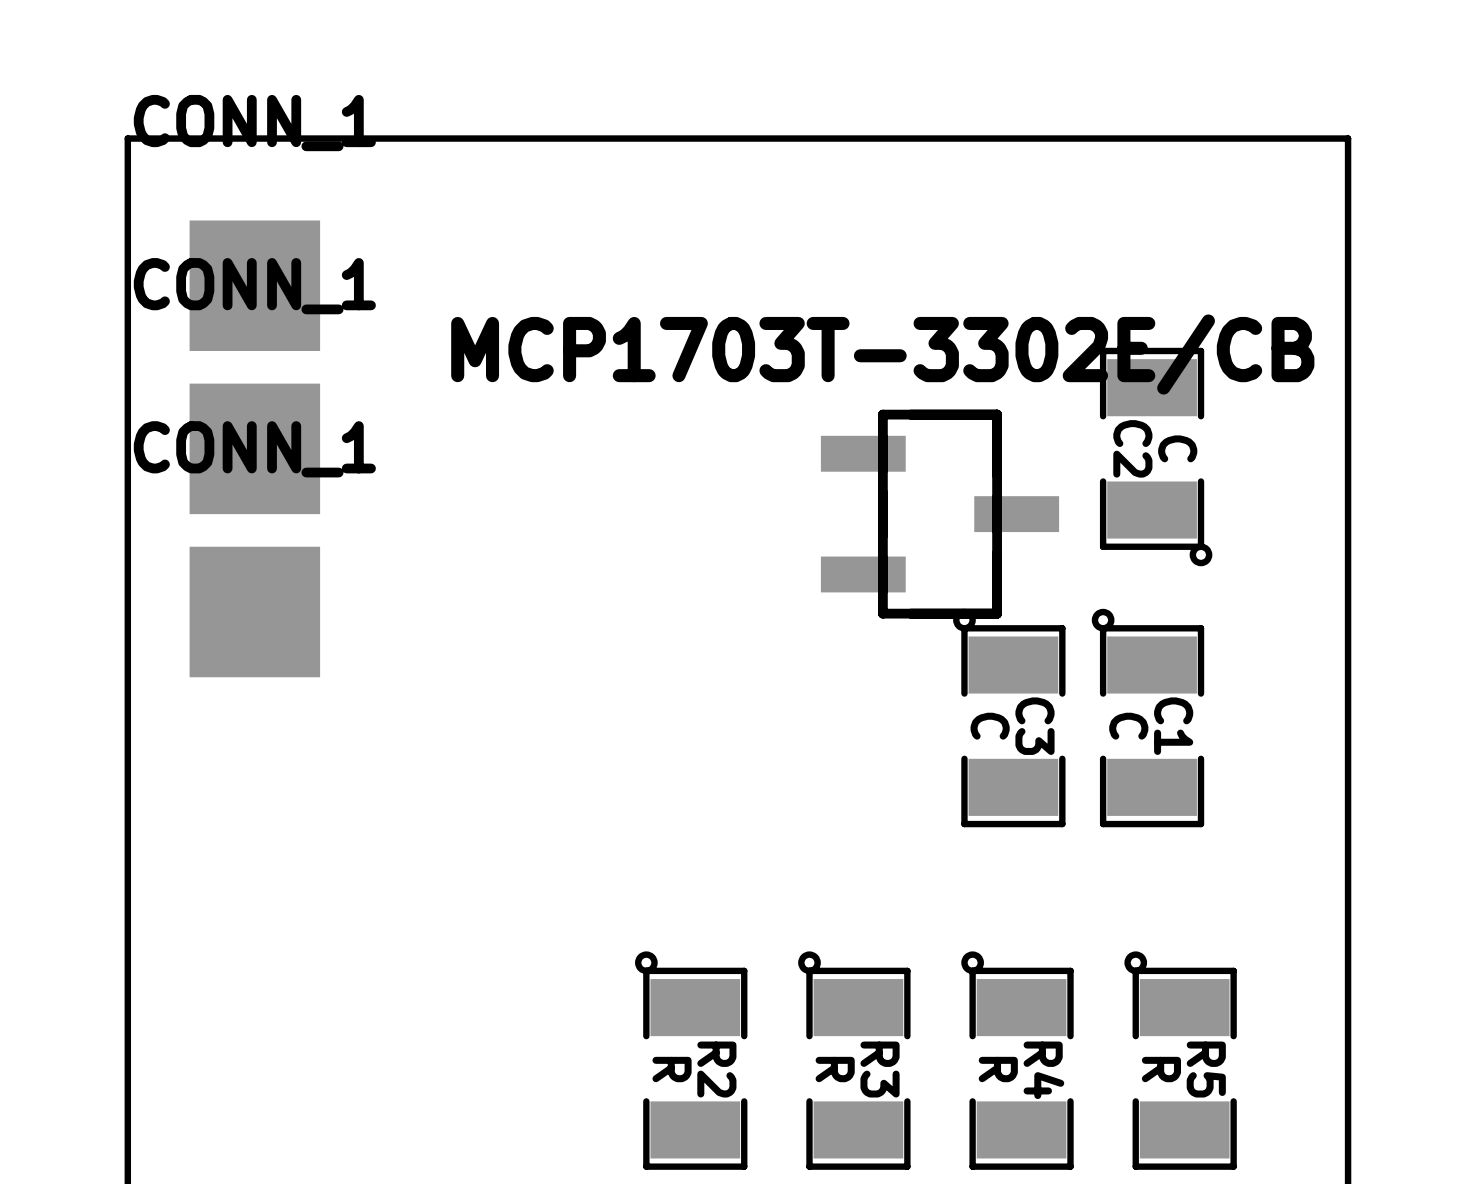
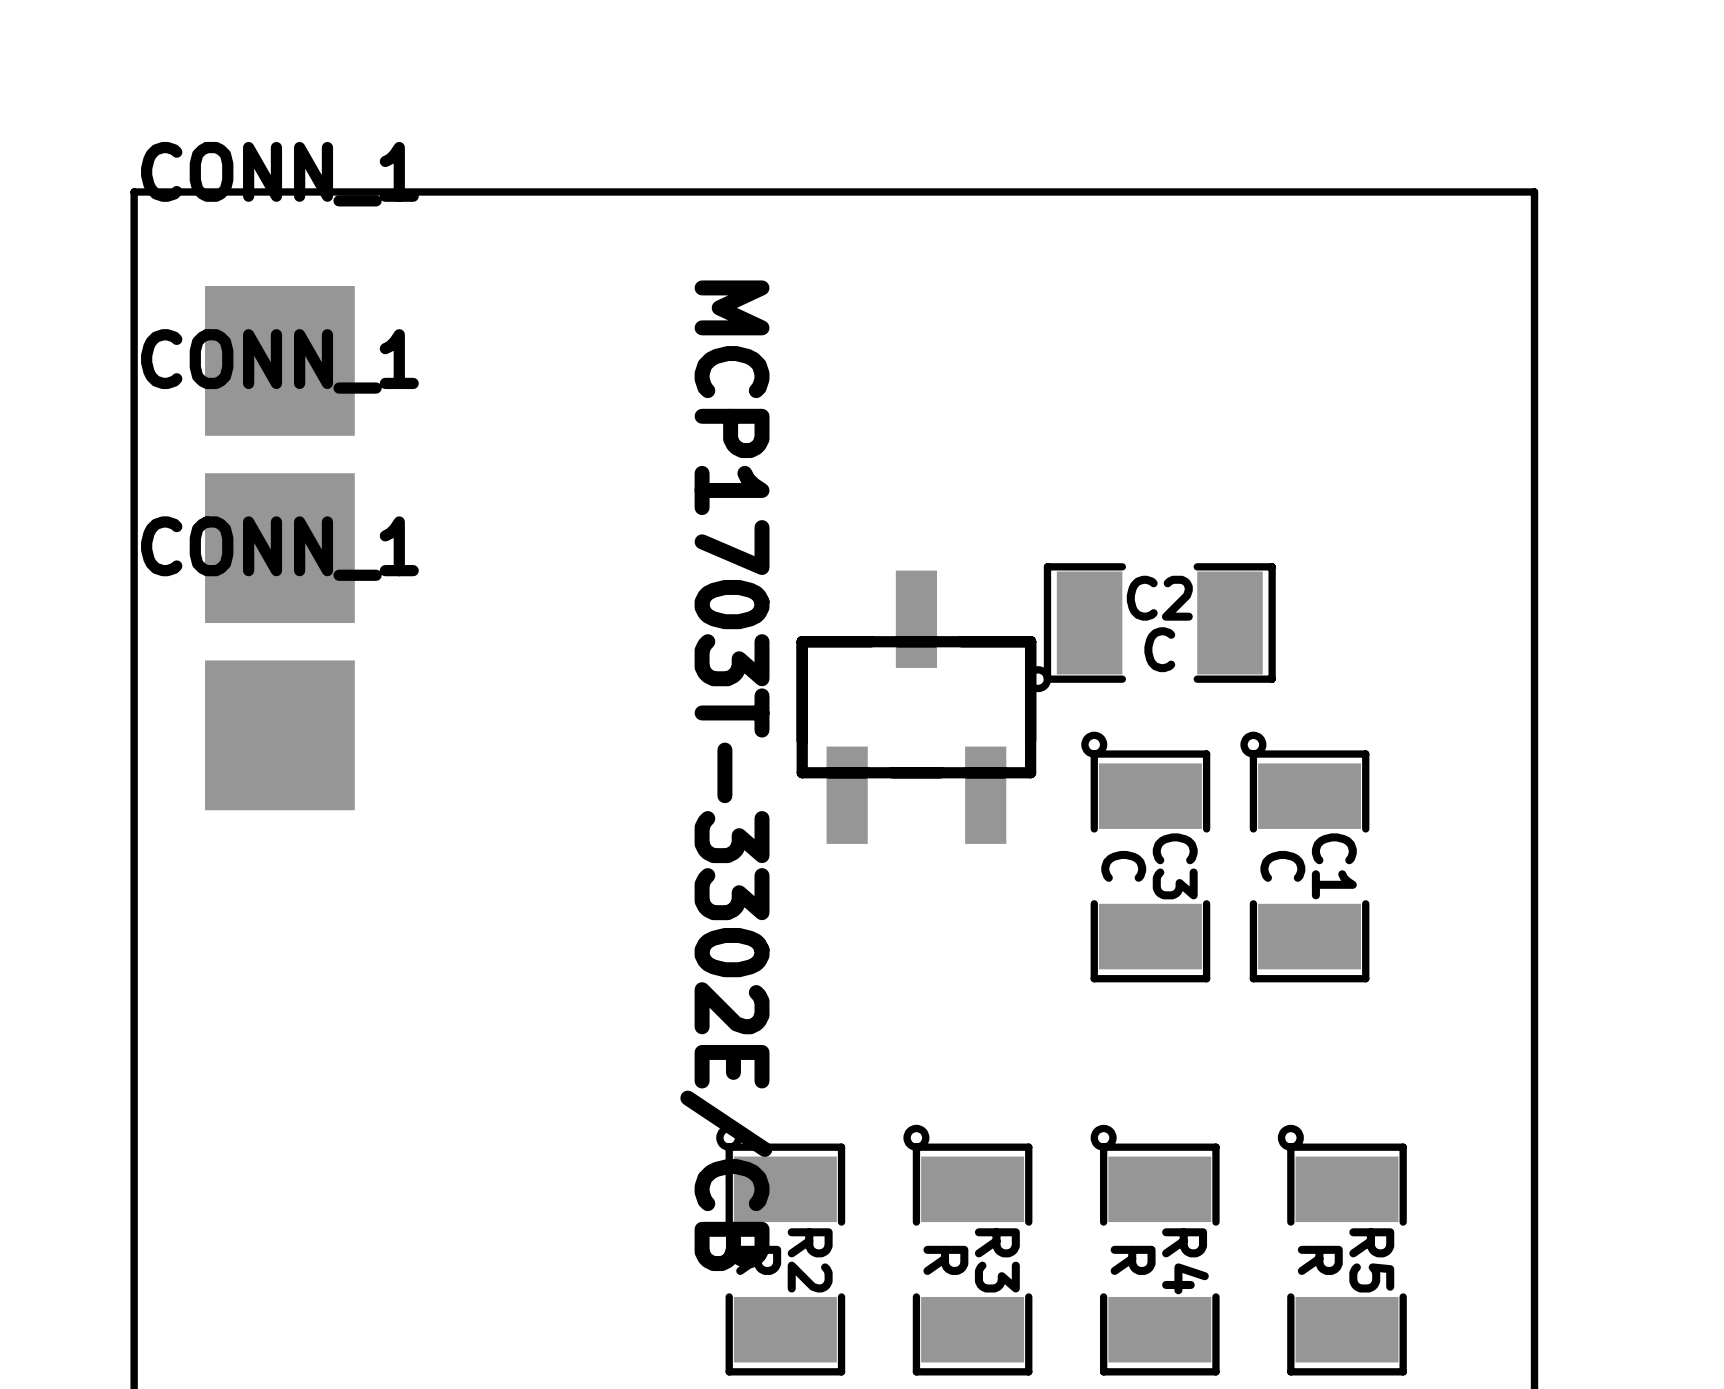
C2 rotation: 0° (1156, 457) -> 90° clockwise (1150, 627)
C2 position: (1156, 457) -> (1150, 627)
part rotation: 0° (939, 514) -> 90° counterclockwise (916, 707)
part position: (939, 514) -> (916, 707)

